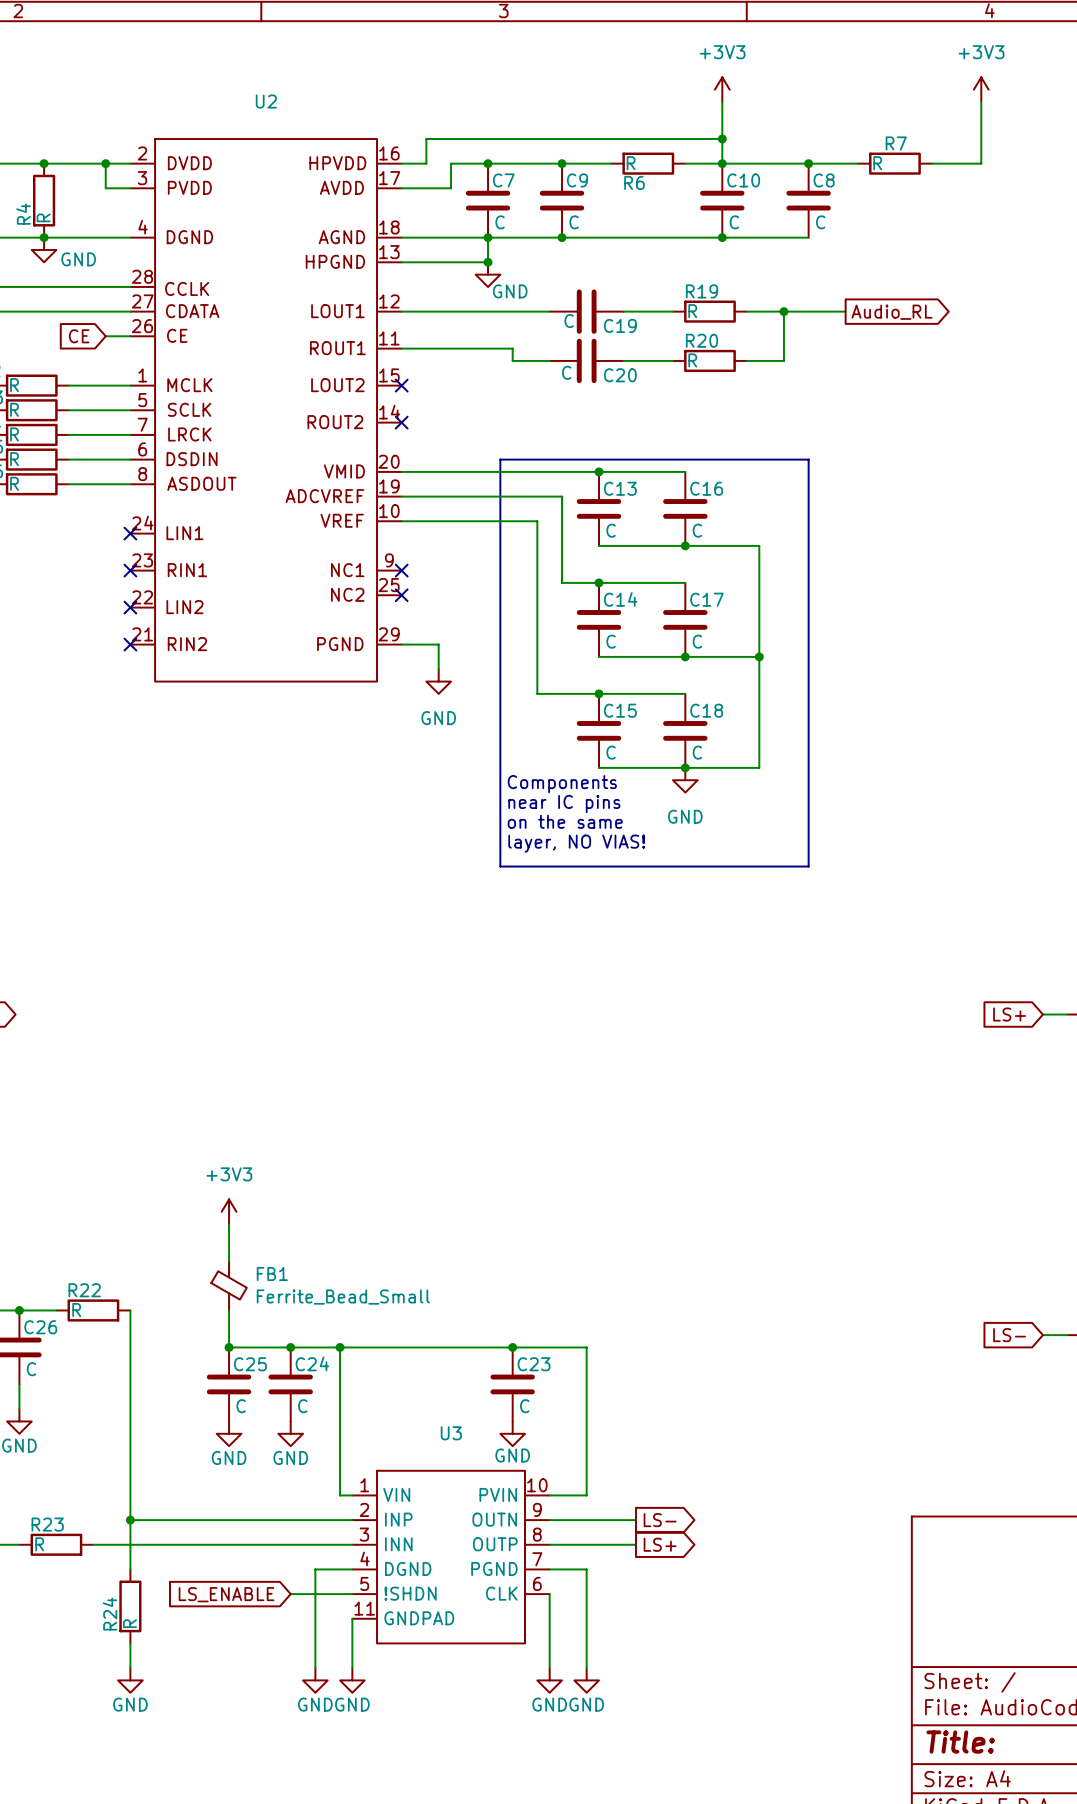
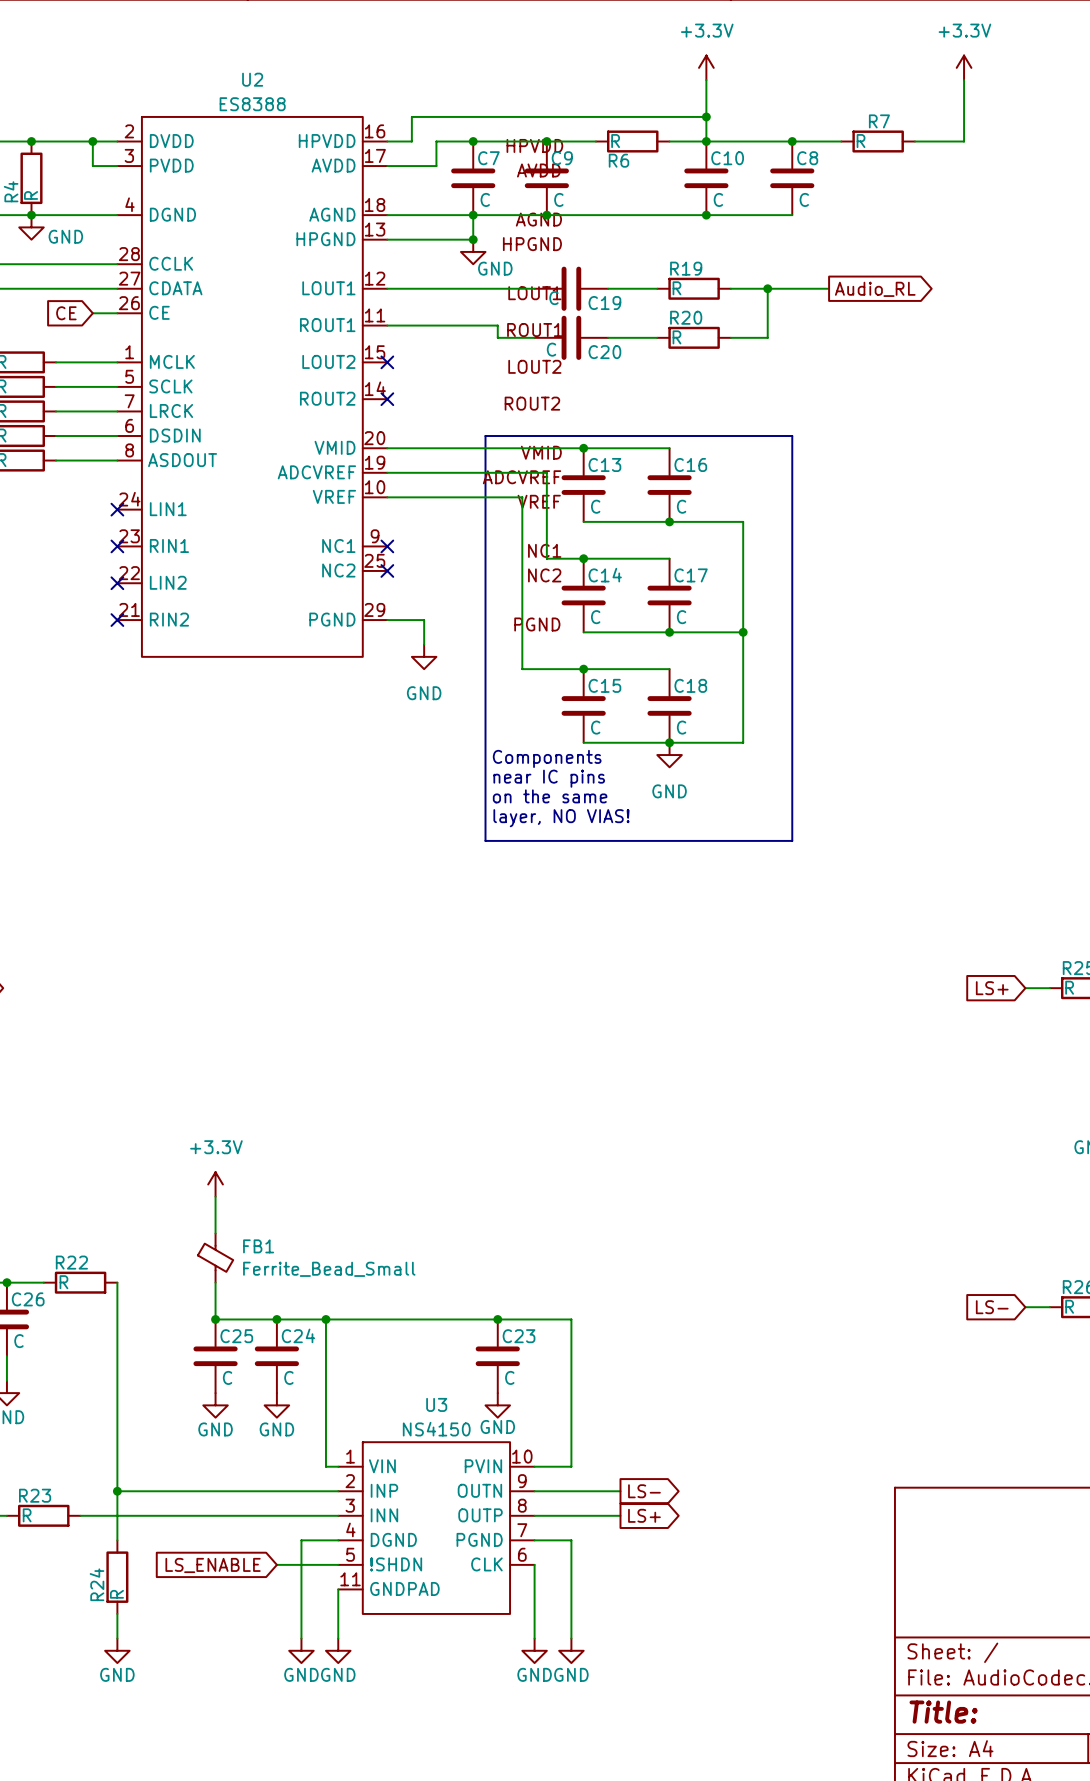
power symbol: +3V3 (722, 89) -> +3.3V (706, 67)
power symbol: +3V3 (981, 89) -> +3.3V (964, 67)
U2 value: none -> ES8388 (252, 104)
U2 symbol: [130, 138, 402, 682] -> [117, 116, 388, 657]
power symbol: +3V3 (229, 1211) -> +3.3V (215, 1184)
U3 value: none -> NS4150 (436, 1429)

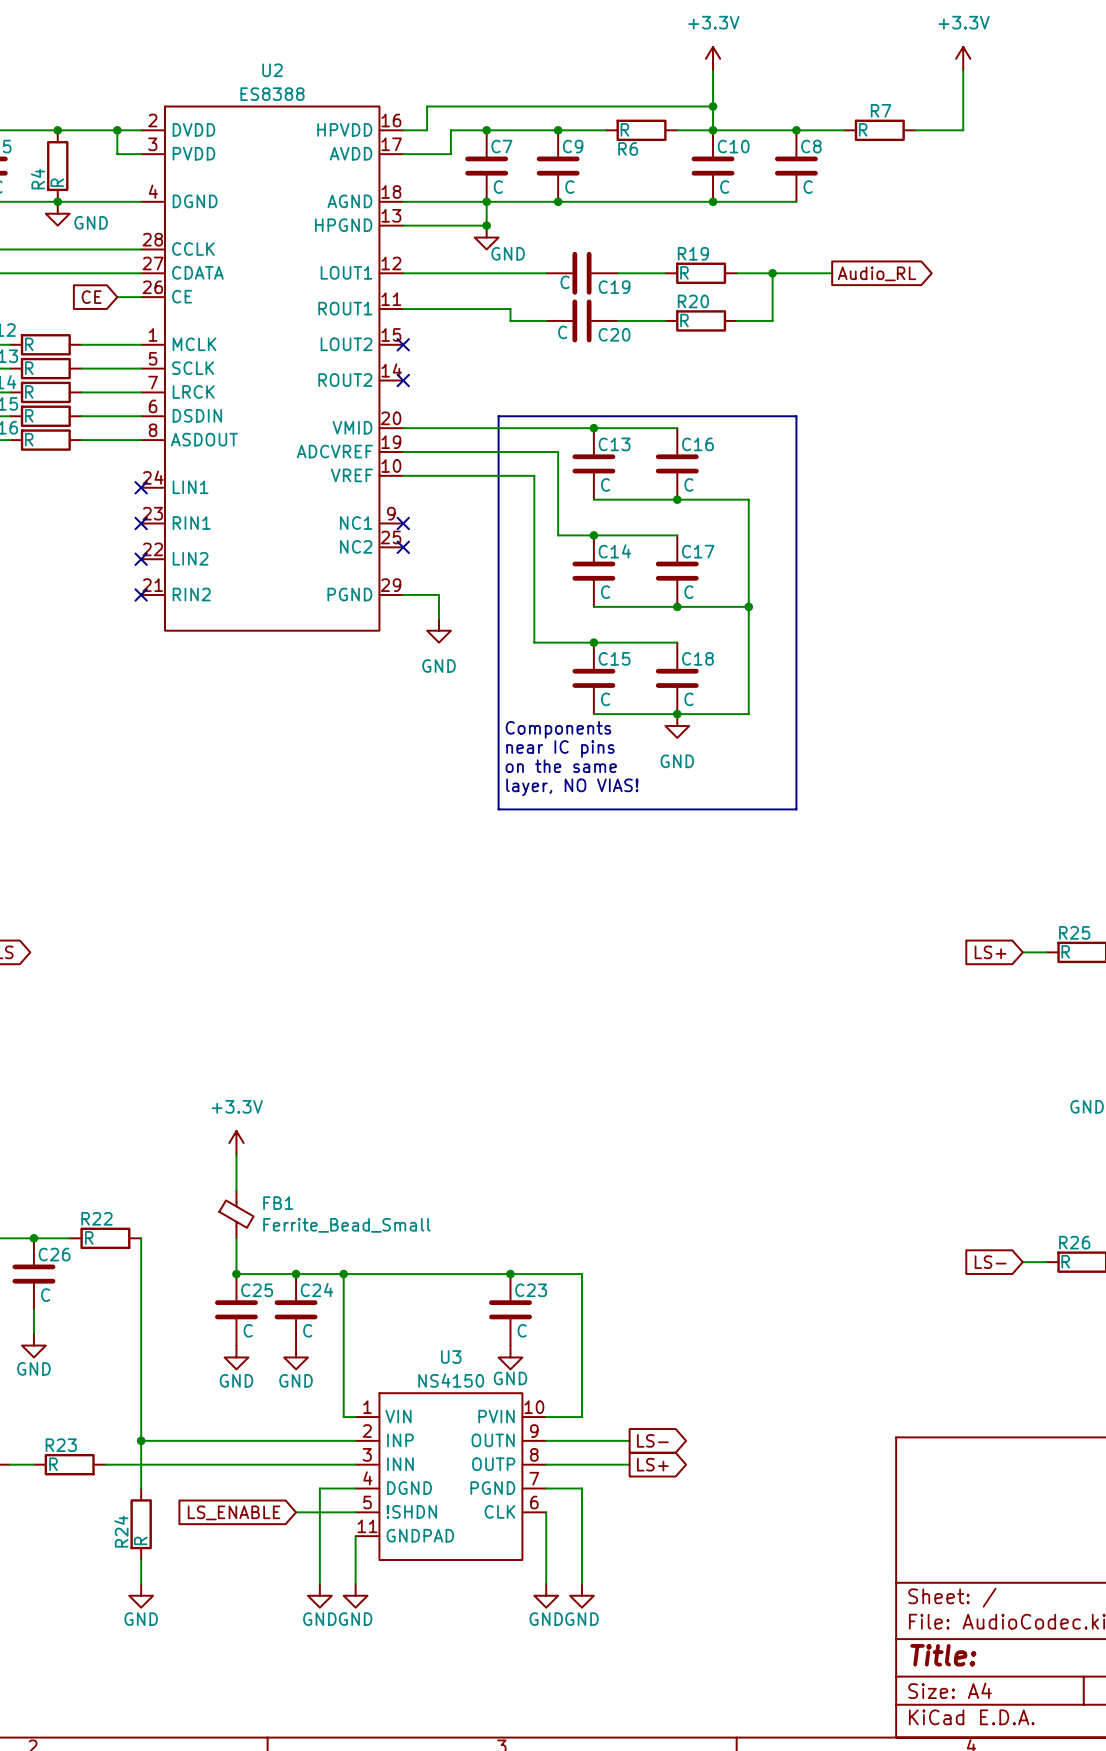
U2 symbol: [117, 116, 388, 657] -> [141, 106, 404, 631]

